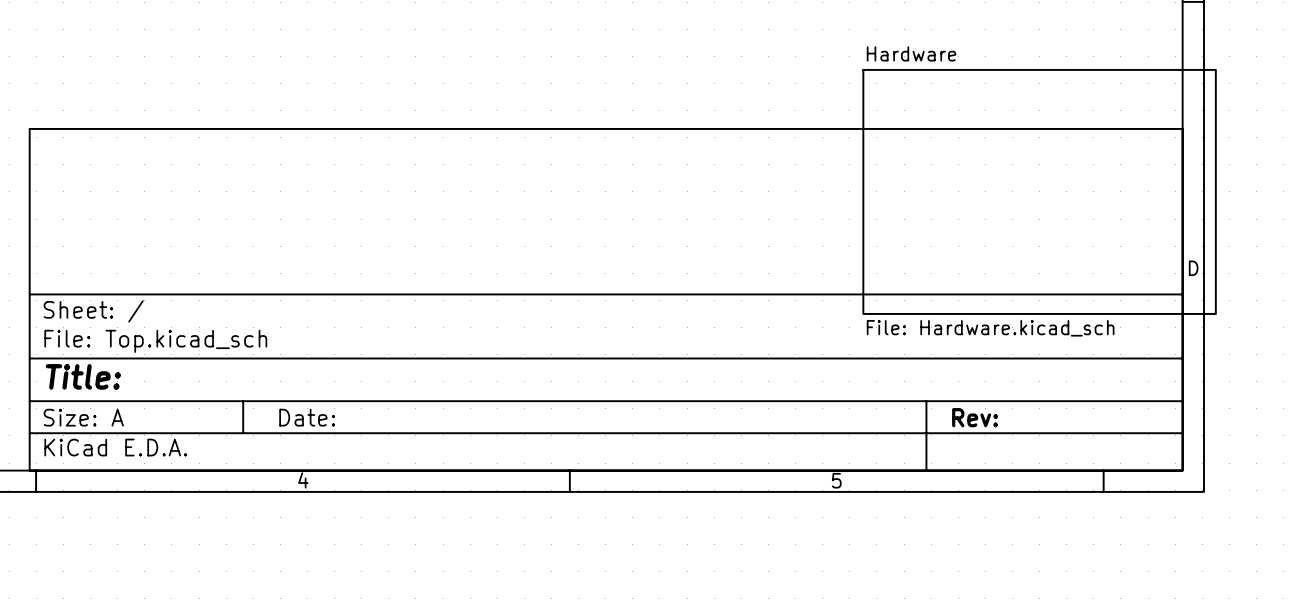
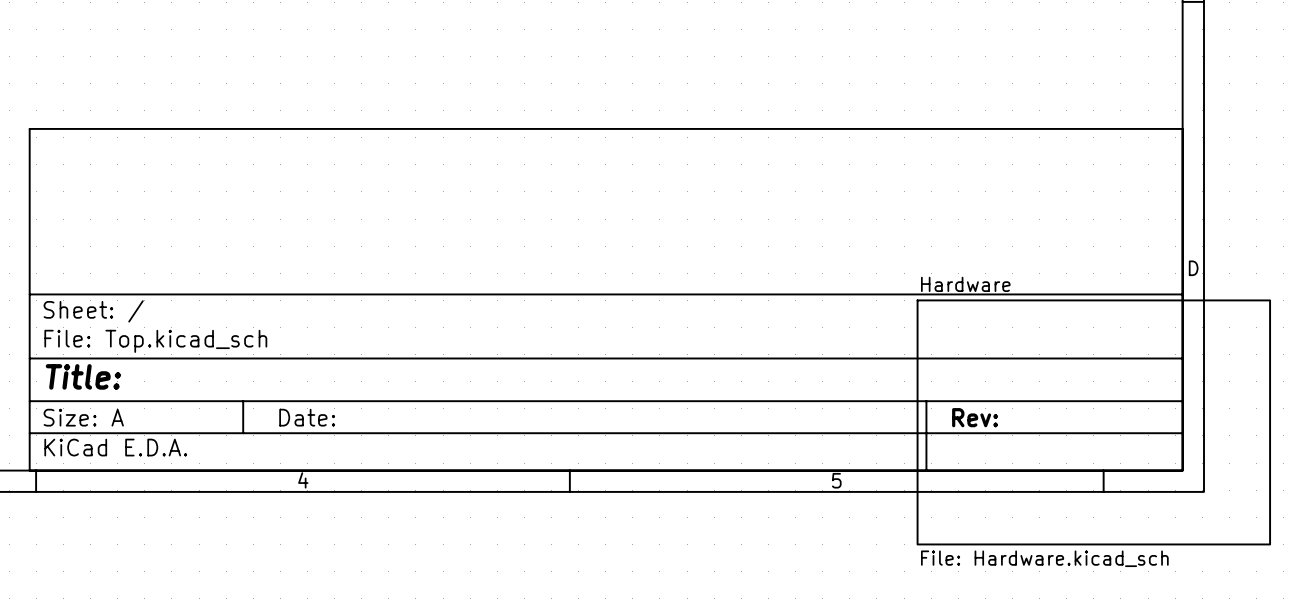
sheet Hardware position: (1039, 191) -> (1093, 422)

